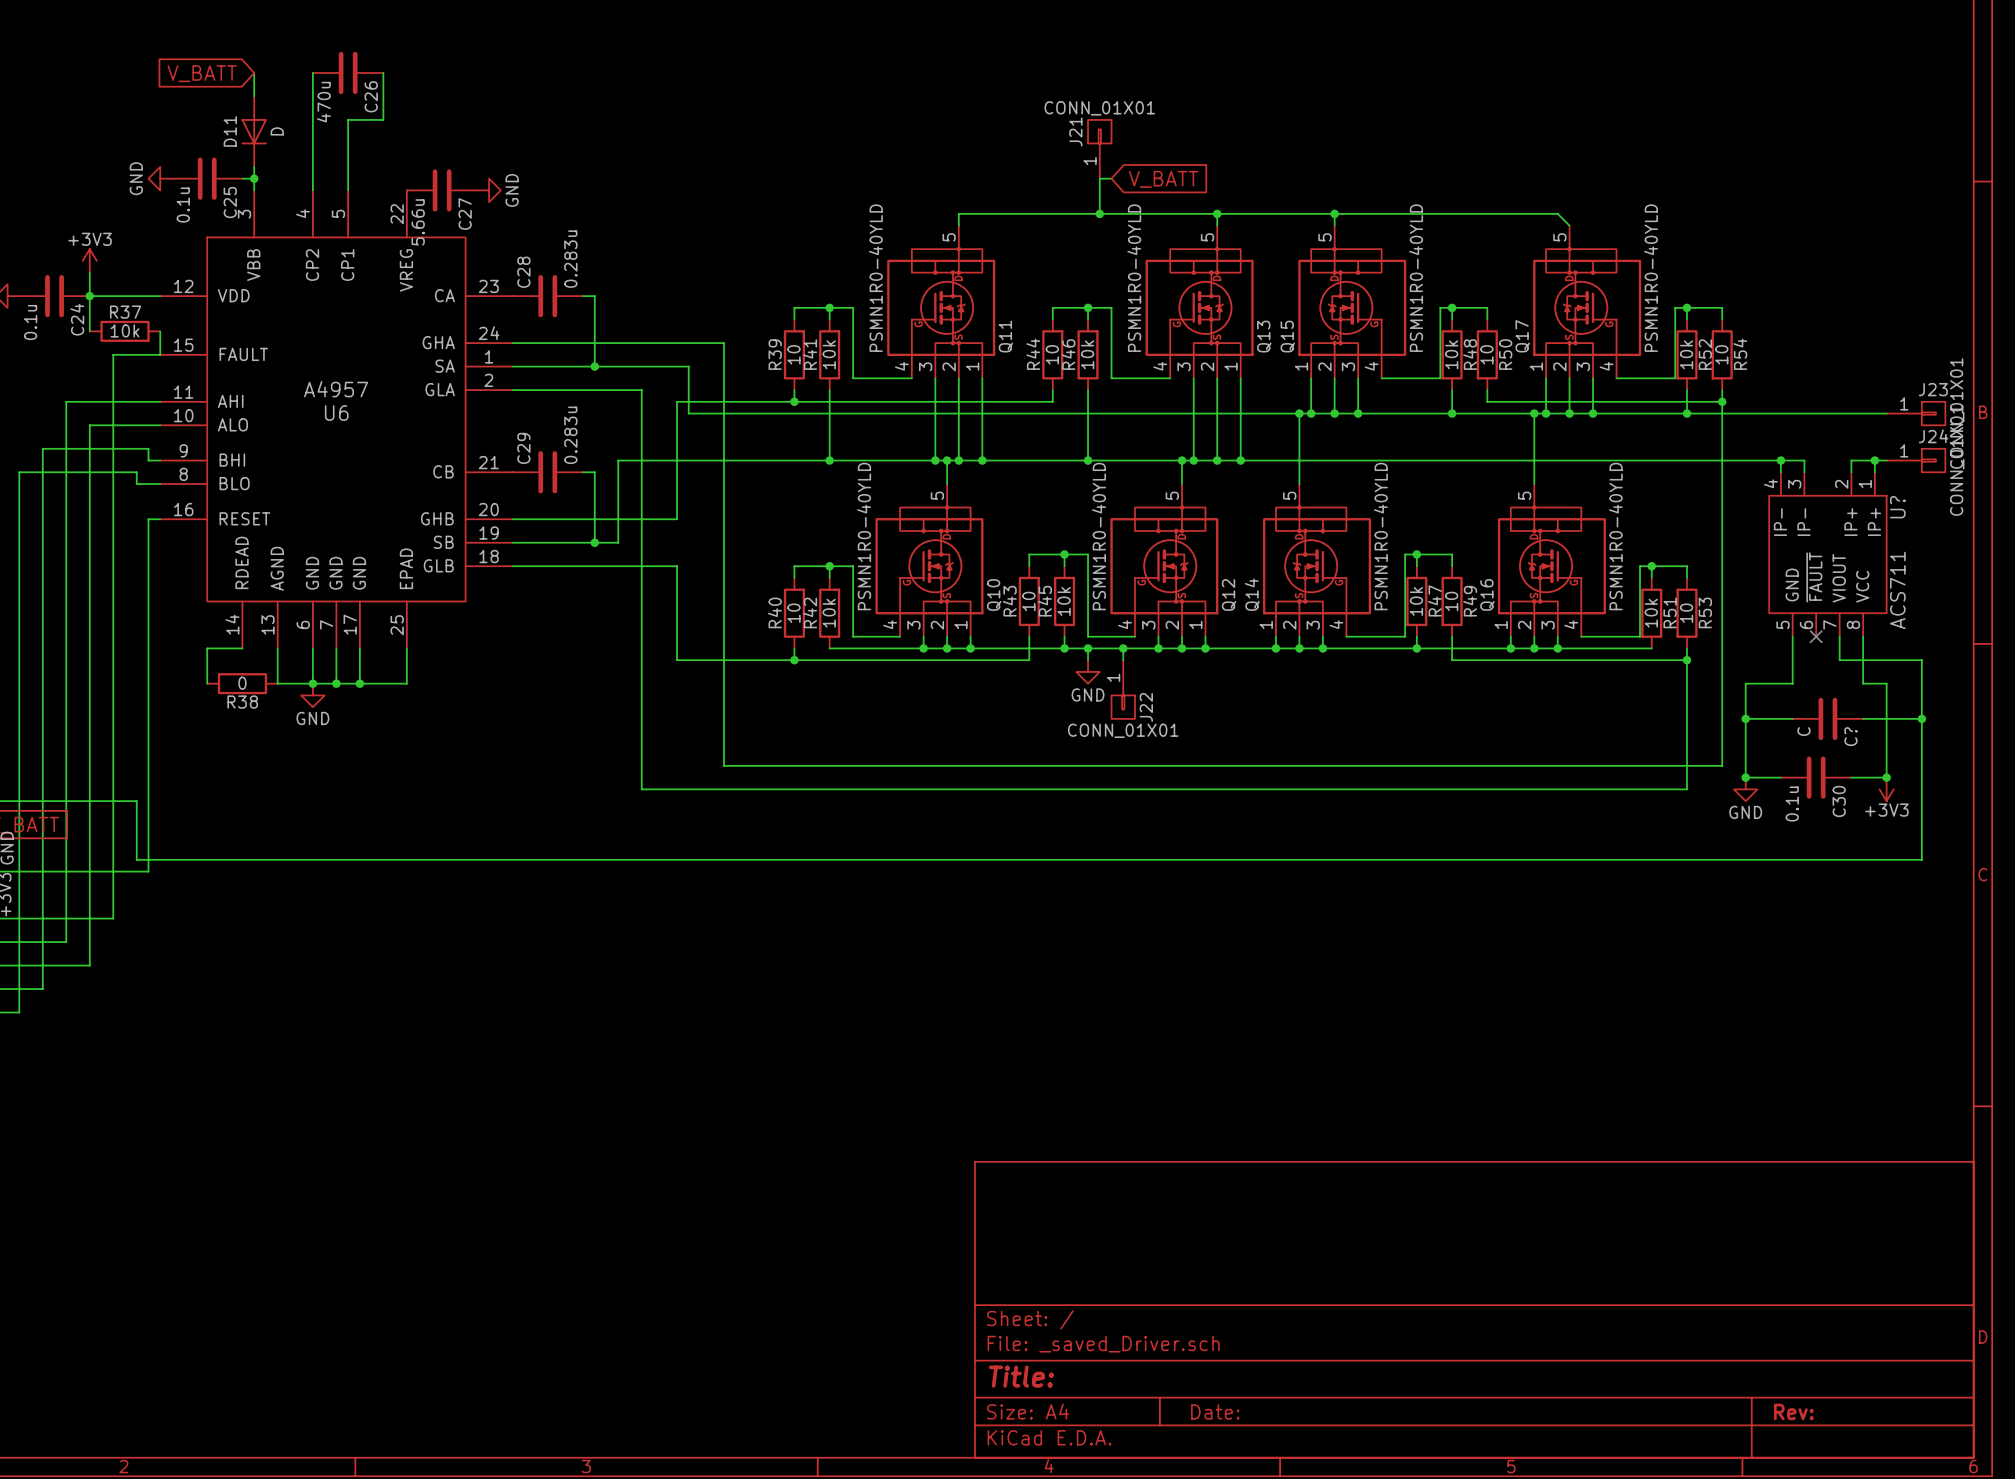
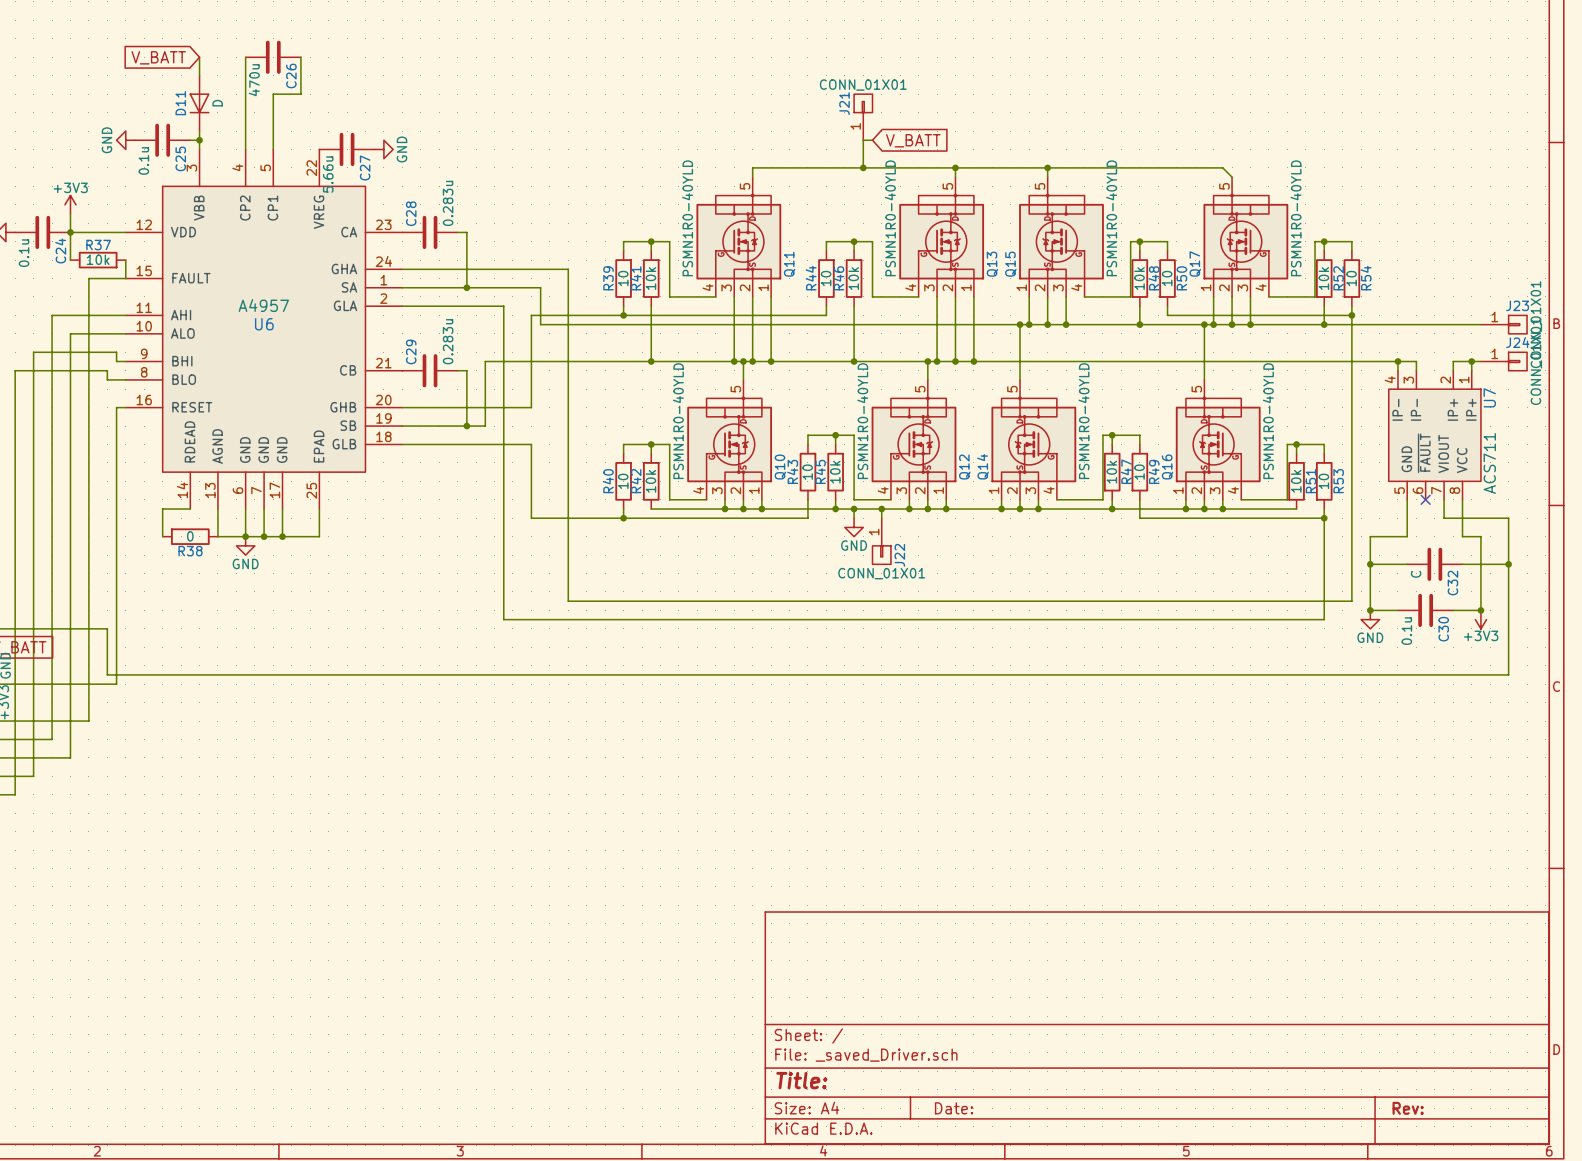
U? name: U? (1897, 507) -> U7 (1489, 397)
C? name: C? (1850, 736) -> C32 (1452, 583)

